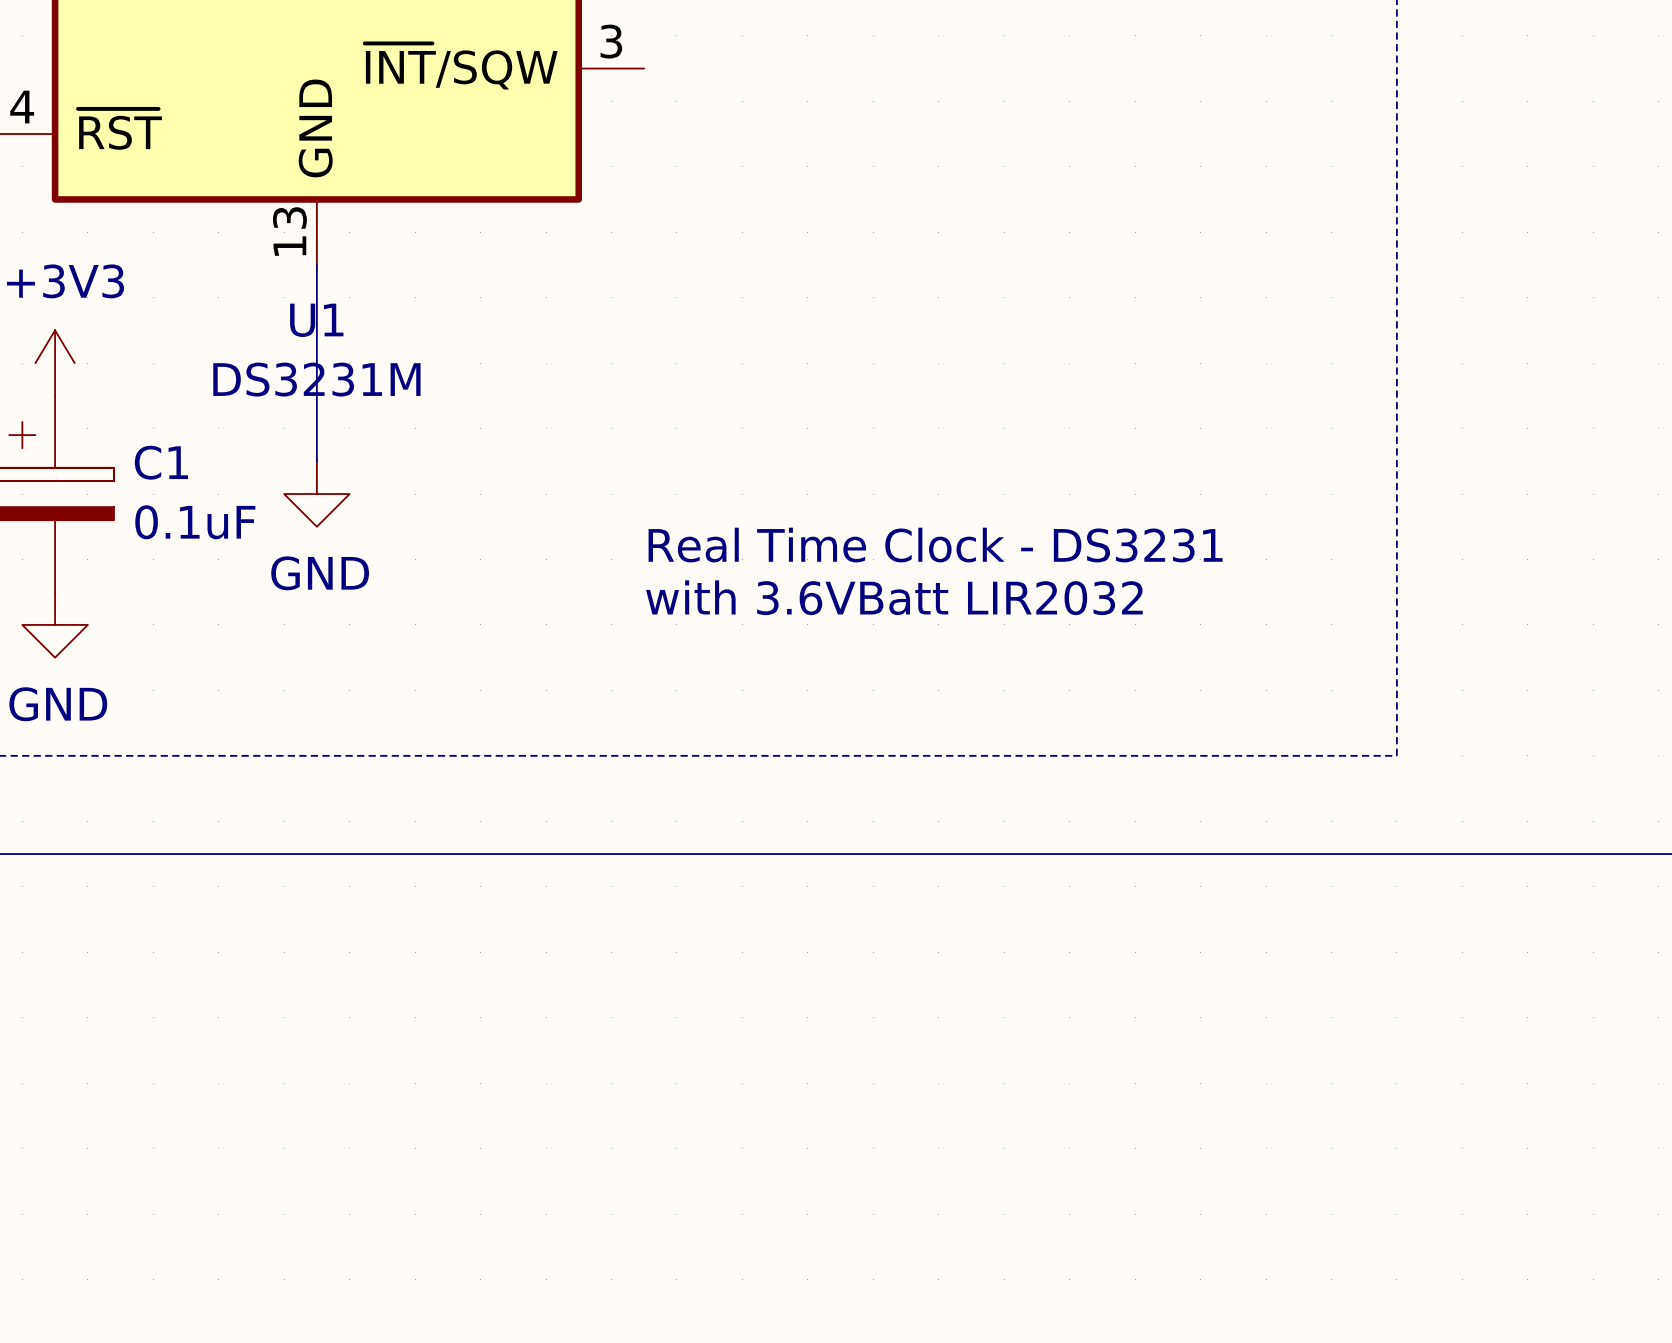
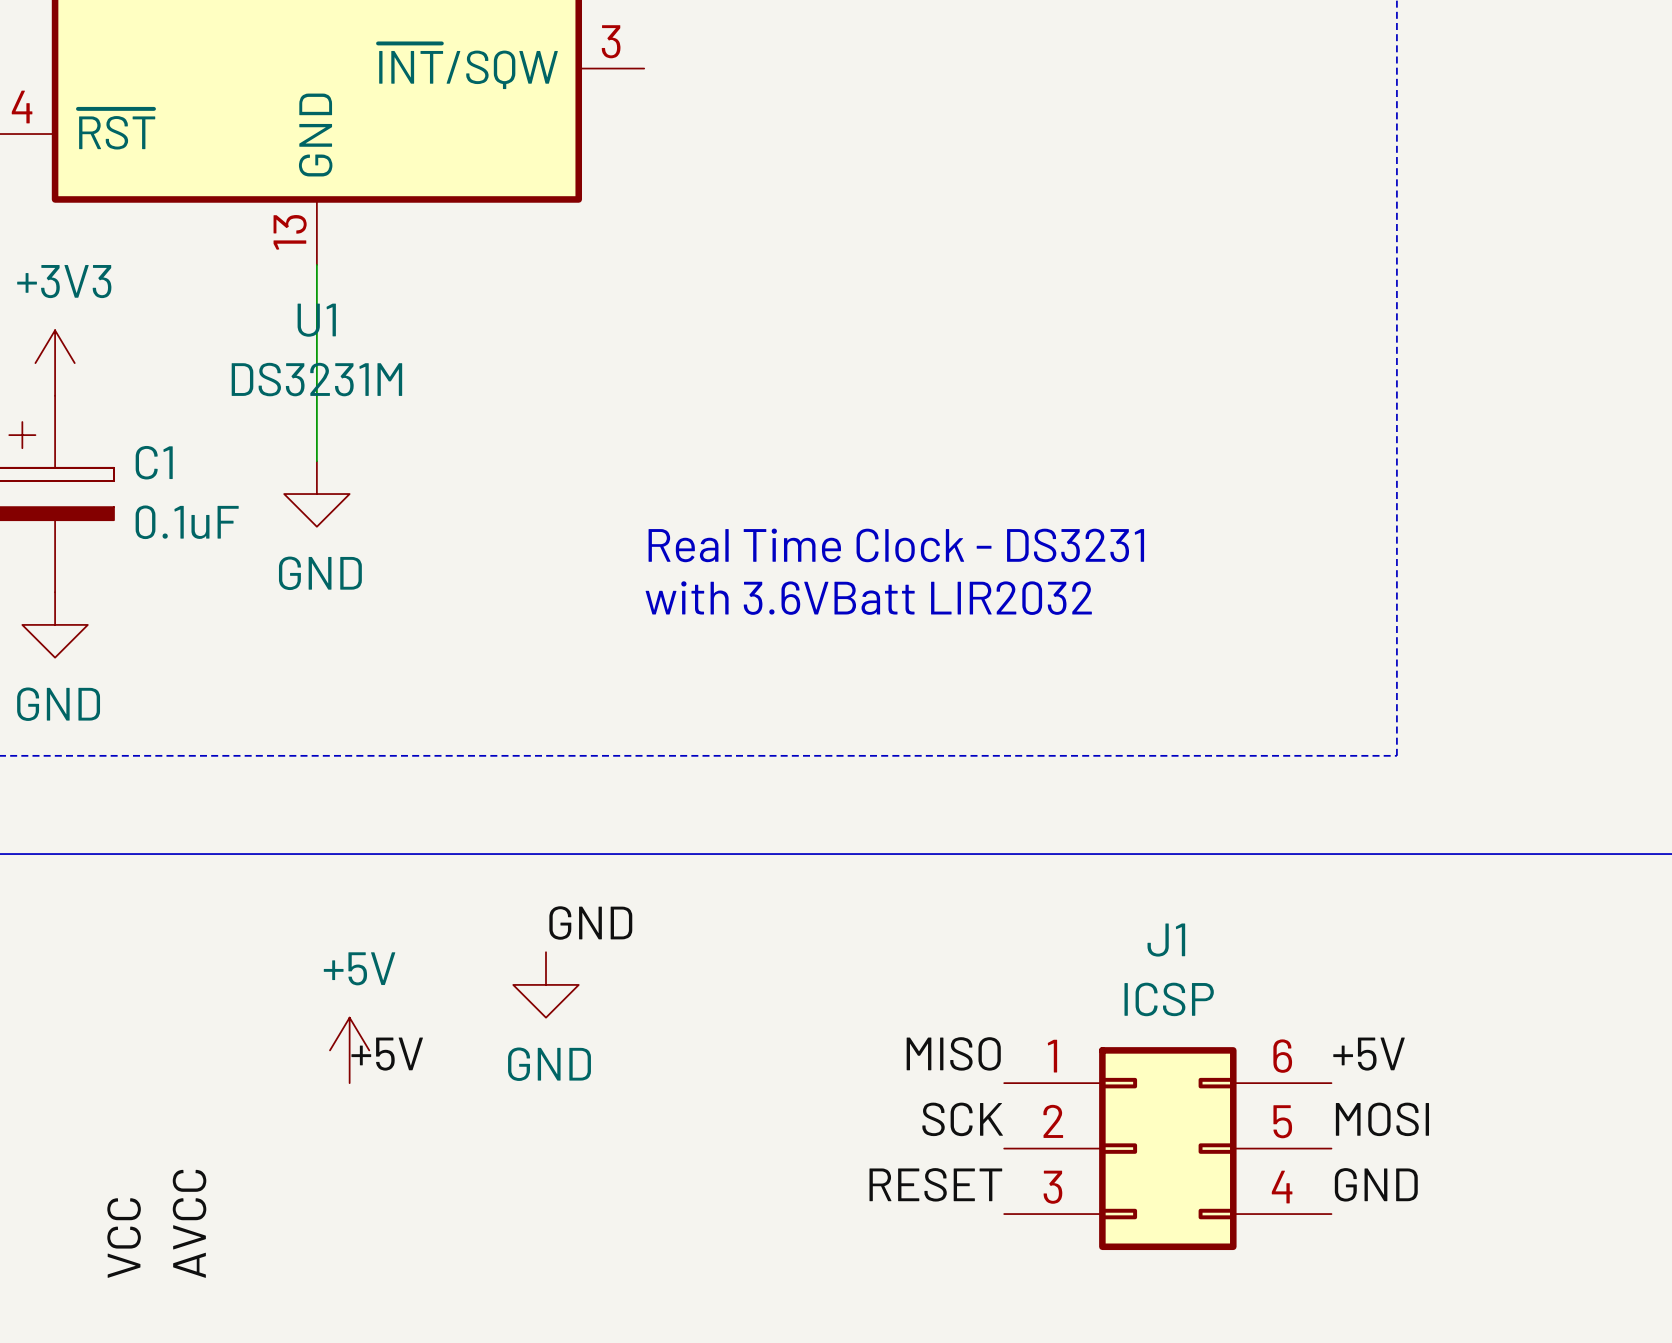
label: none -> GND (590, 923)
power symbol: none -> GND (546, 984)
power symbol: none -> +5V (349, 1050)
label: none -> MISO (953, 1053)
label: none -> +5V (387, 1054)
label: none -> +5V (1369, 1054)
label: none -> SCK (962, 1119)
label: none -> MOSI (1382, 1119)
J1: none -> ICSP (1167, 1148)
label: none -> RESET (935, 1184)
label: none -> GND (1376, 1184)
label: none -> AVCC (189, 1223)
label: none -> VCC (124, 1238)

